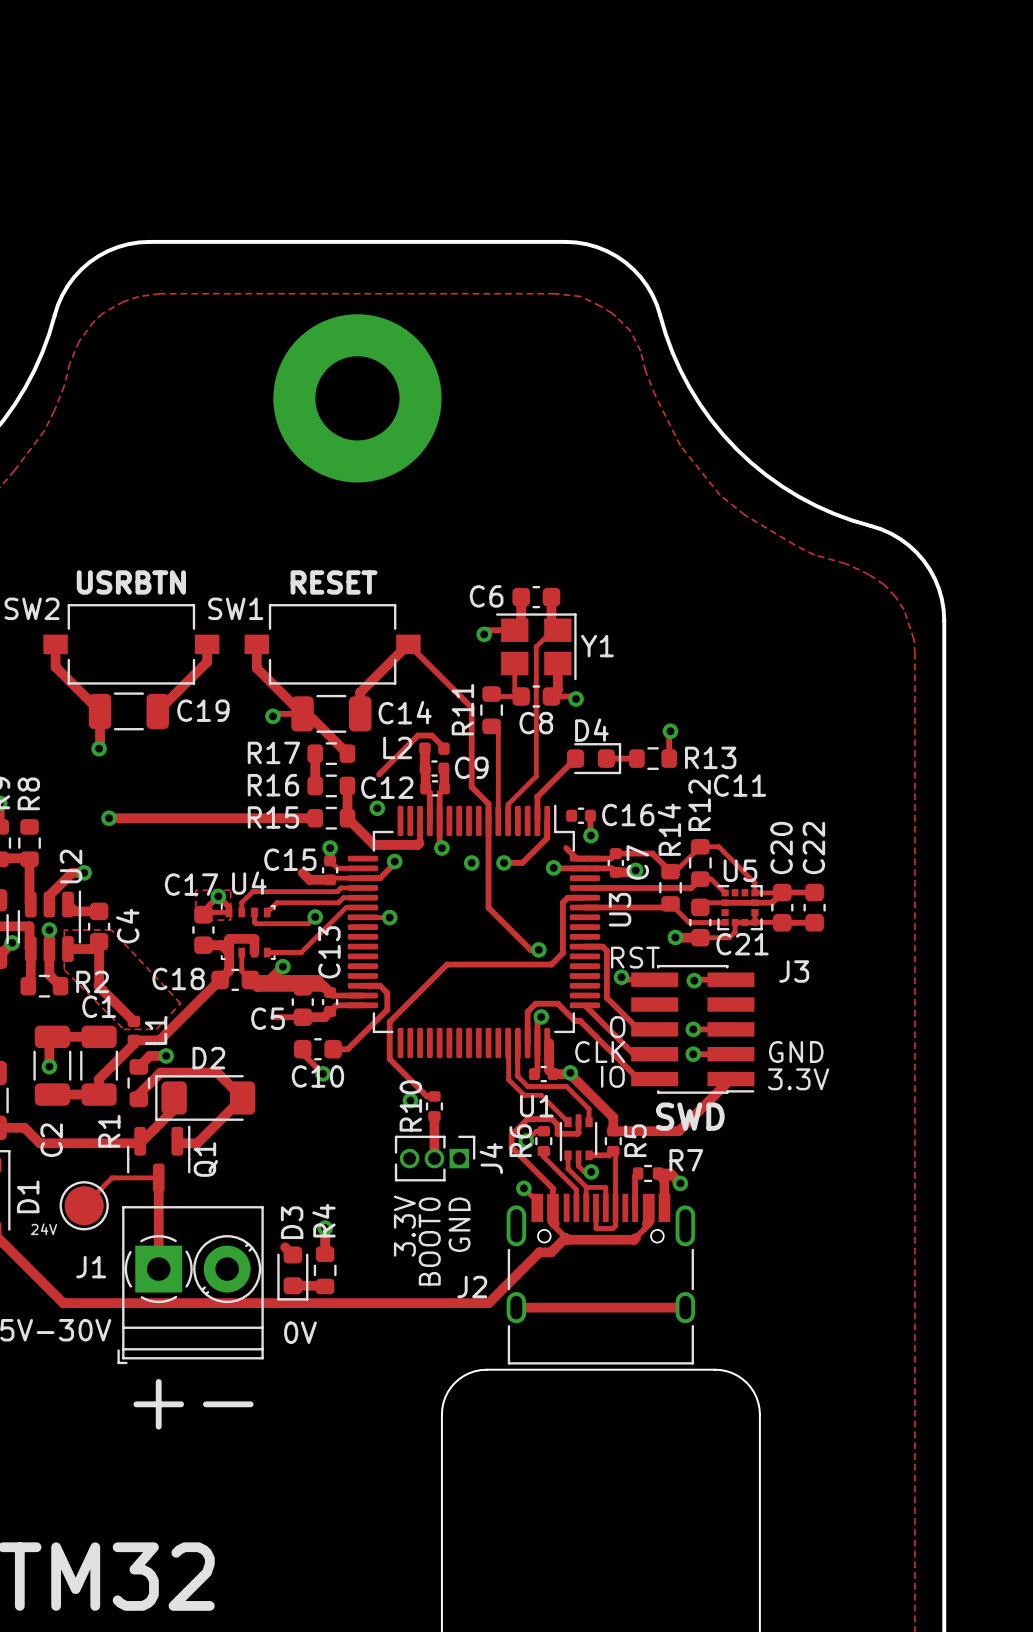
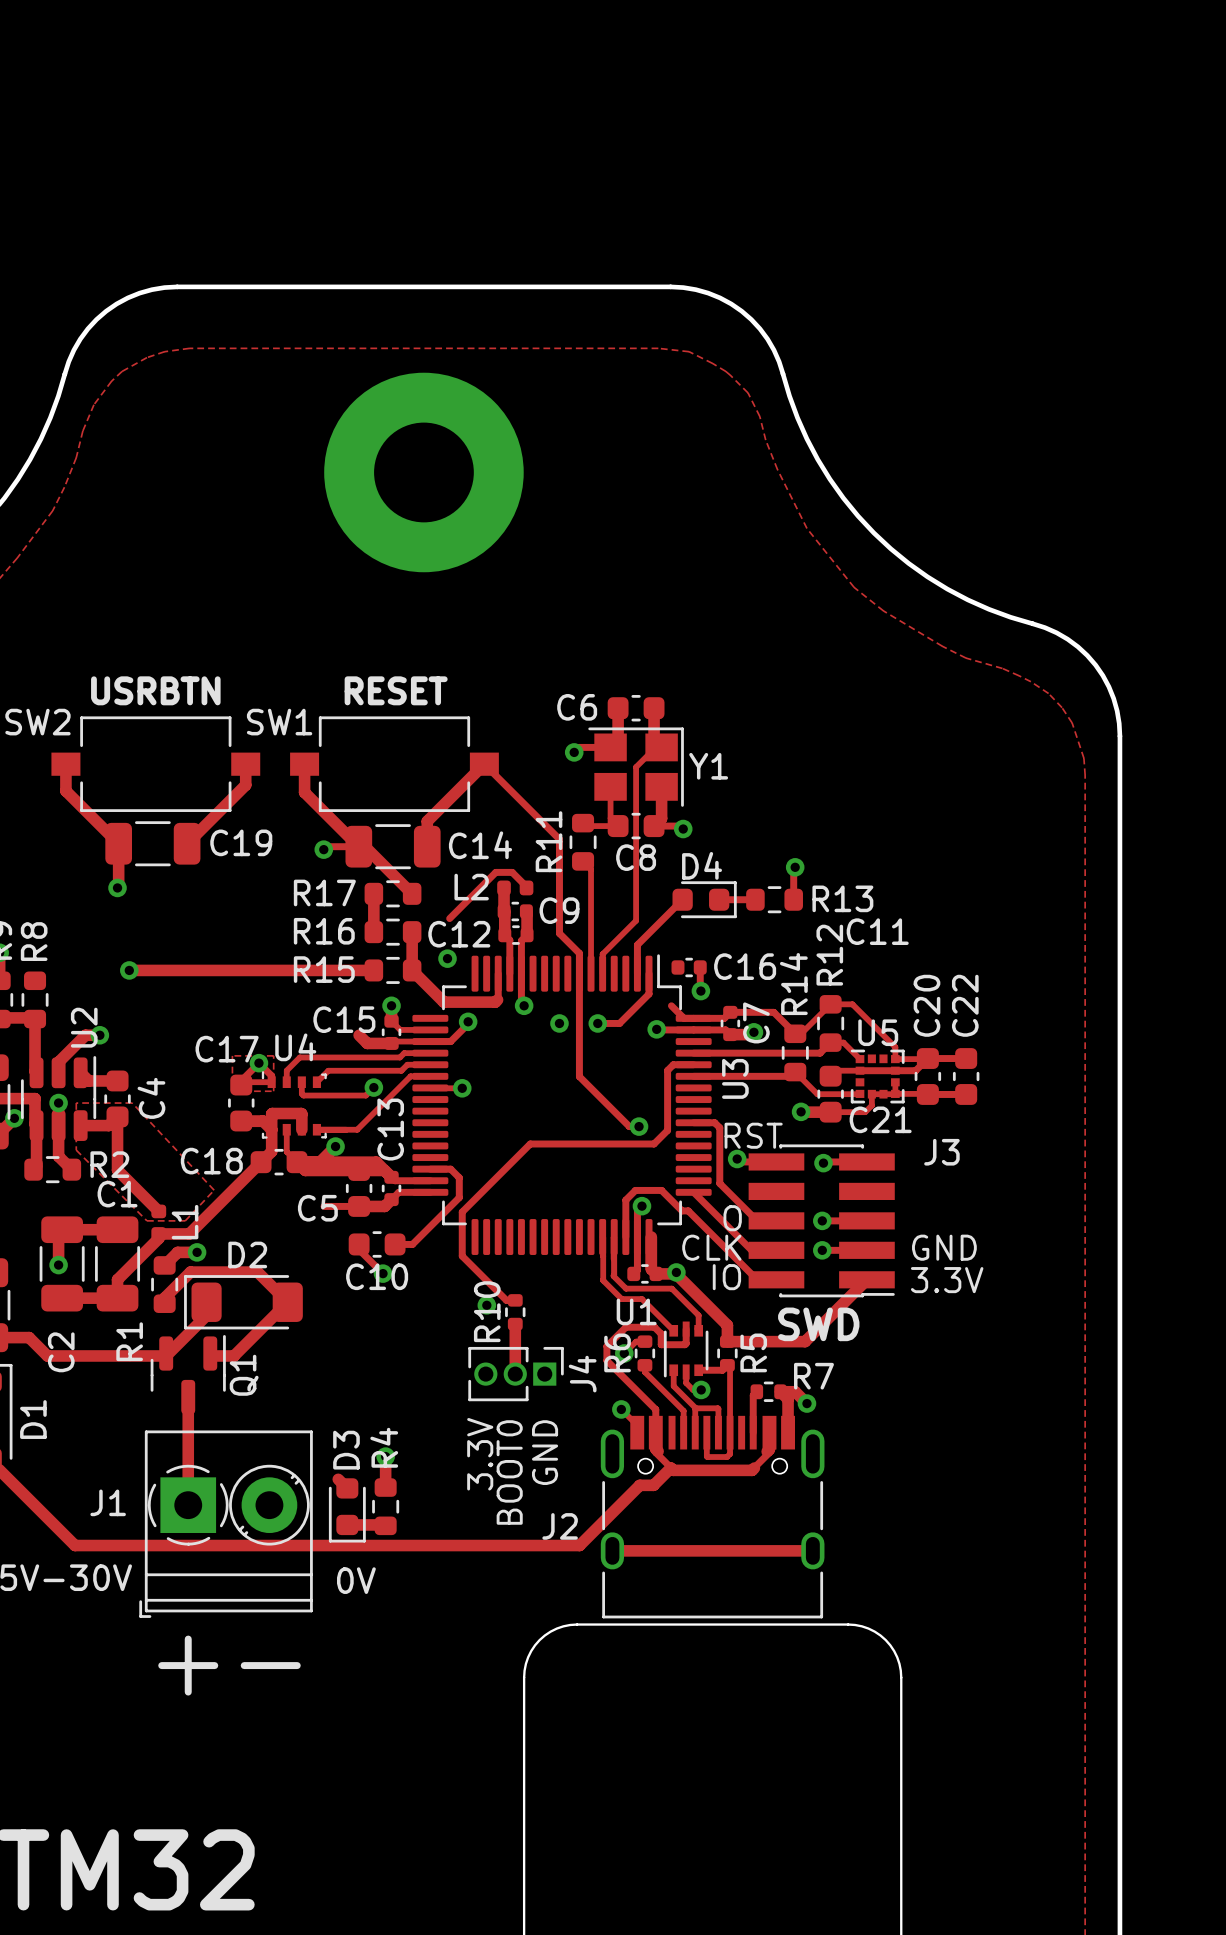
track: (158, 1177) (112, 1177) (84, 1205) -> none
part: (84, 1205) -> none
text: 24V (44, 1229) -> none

